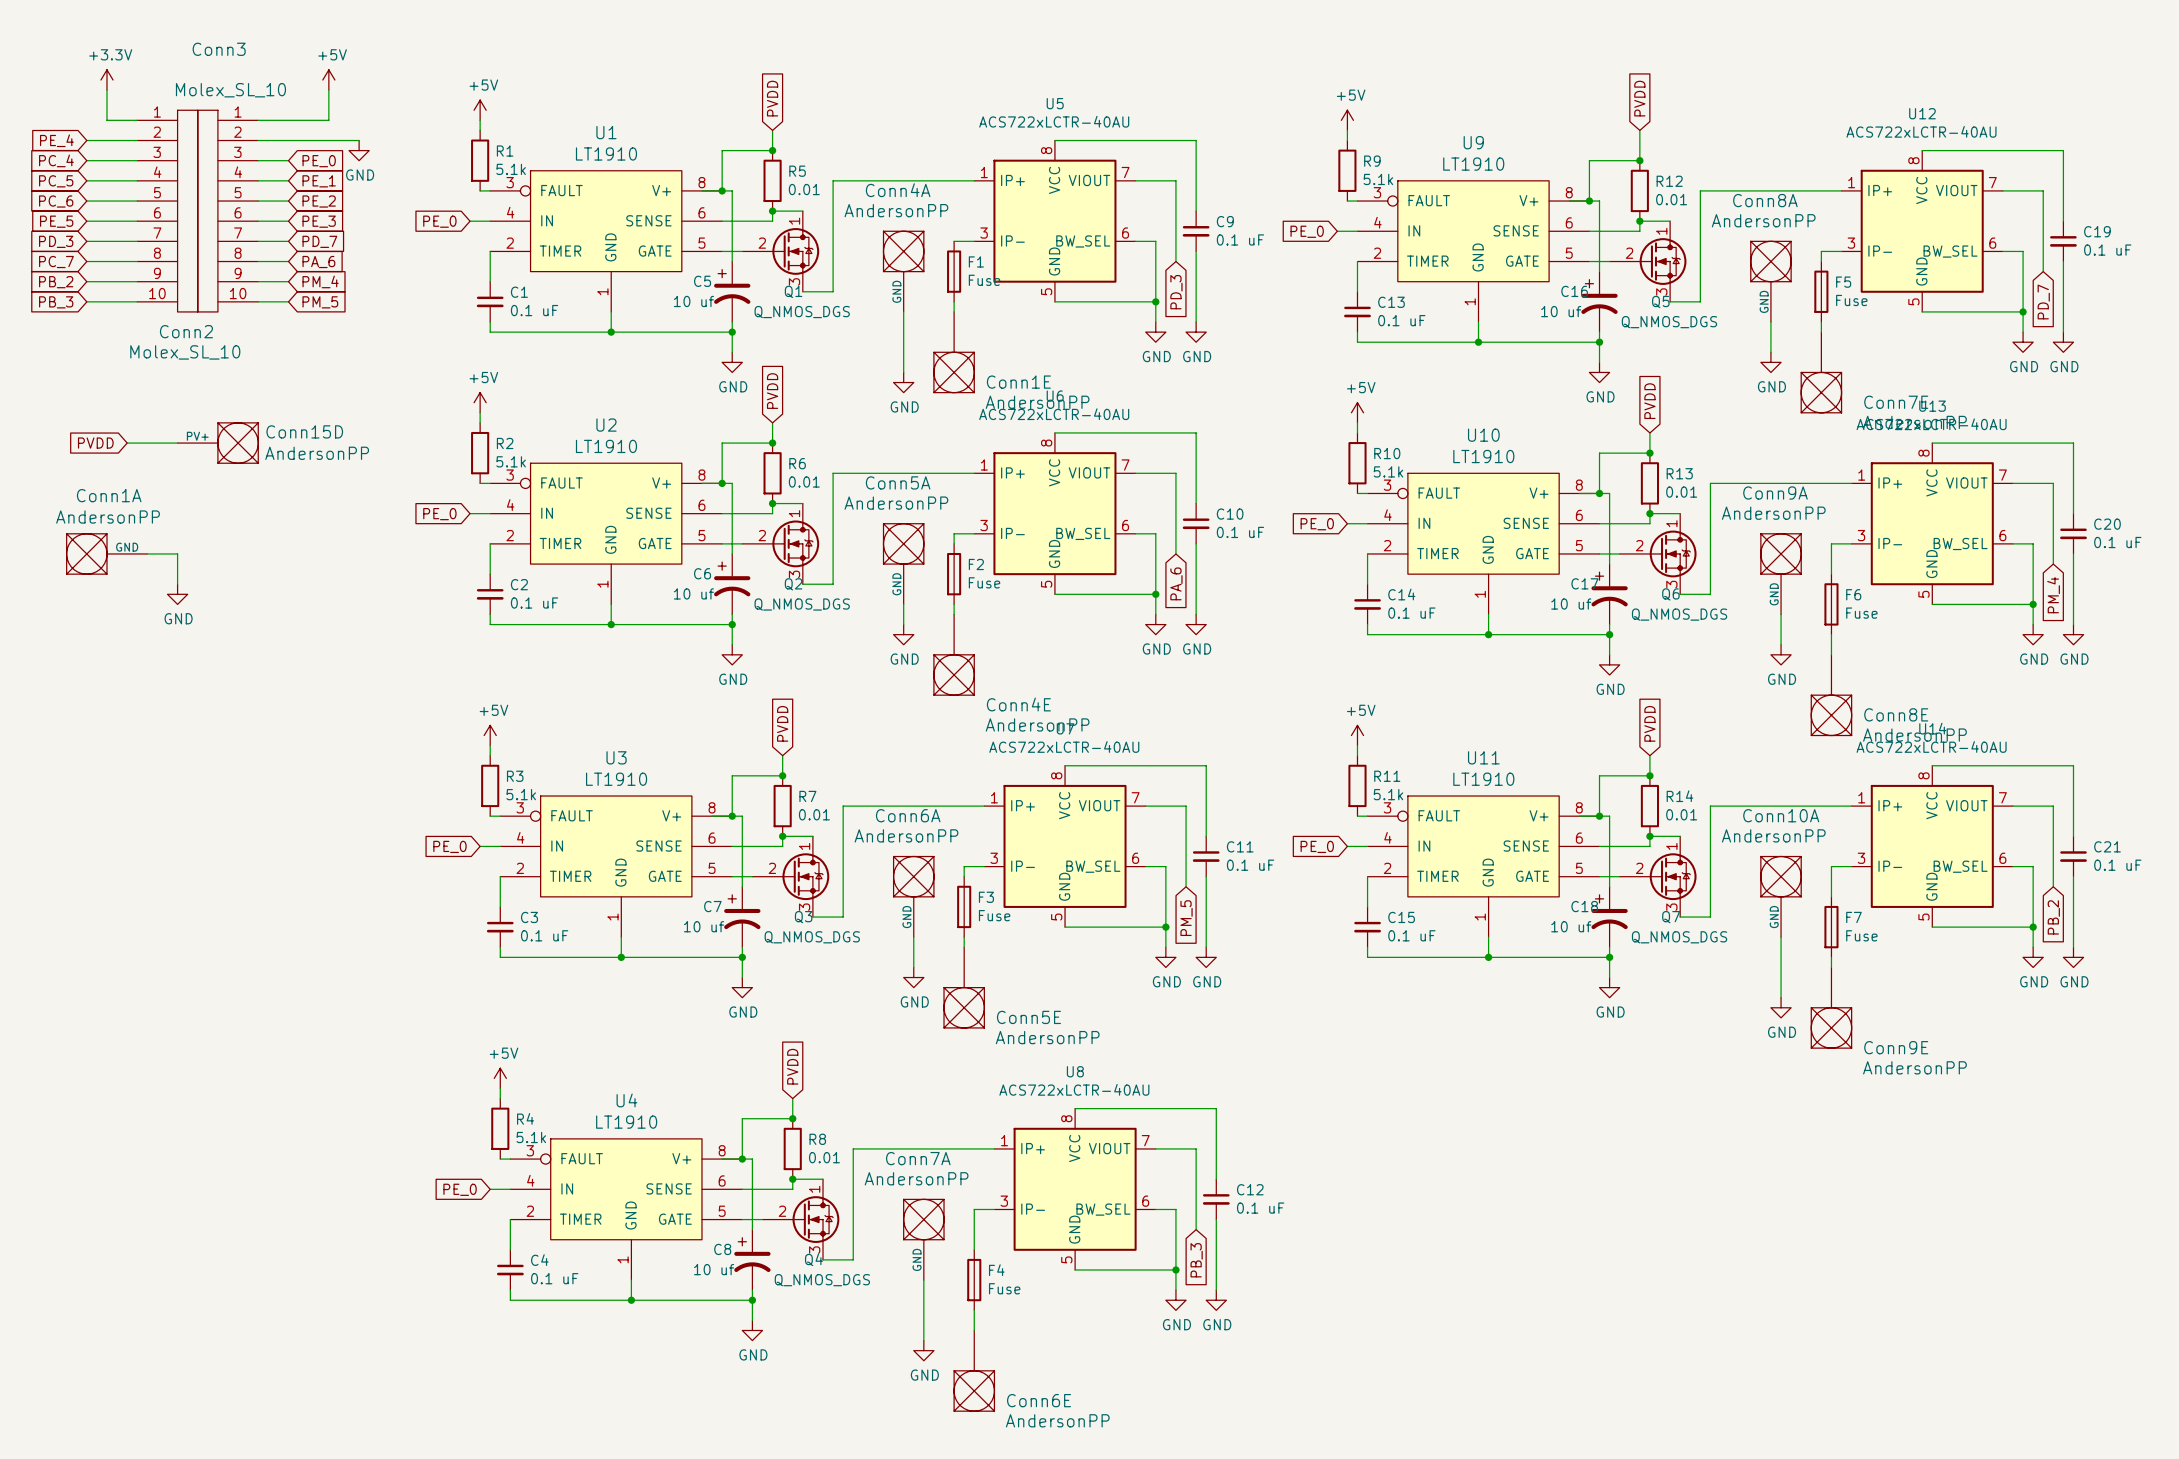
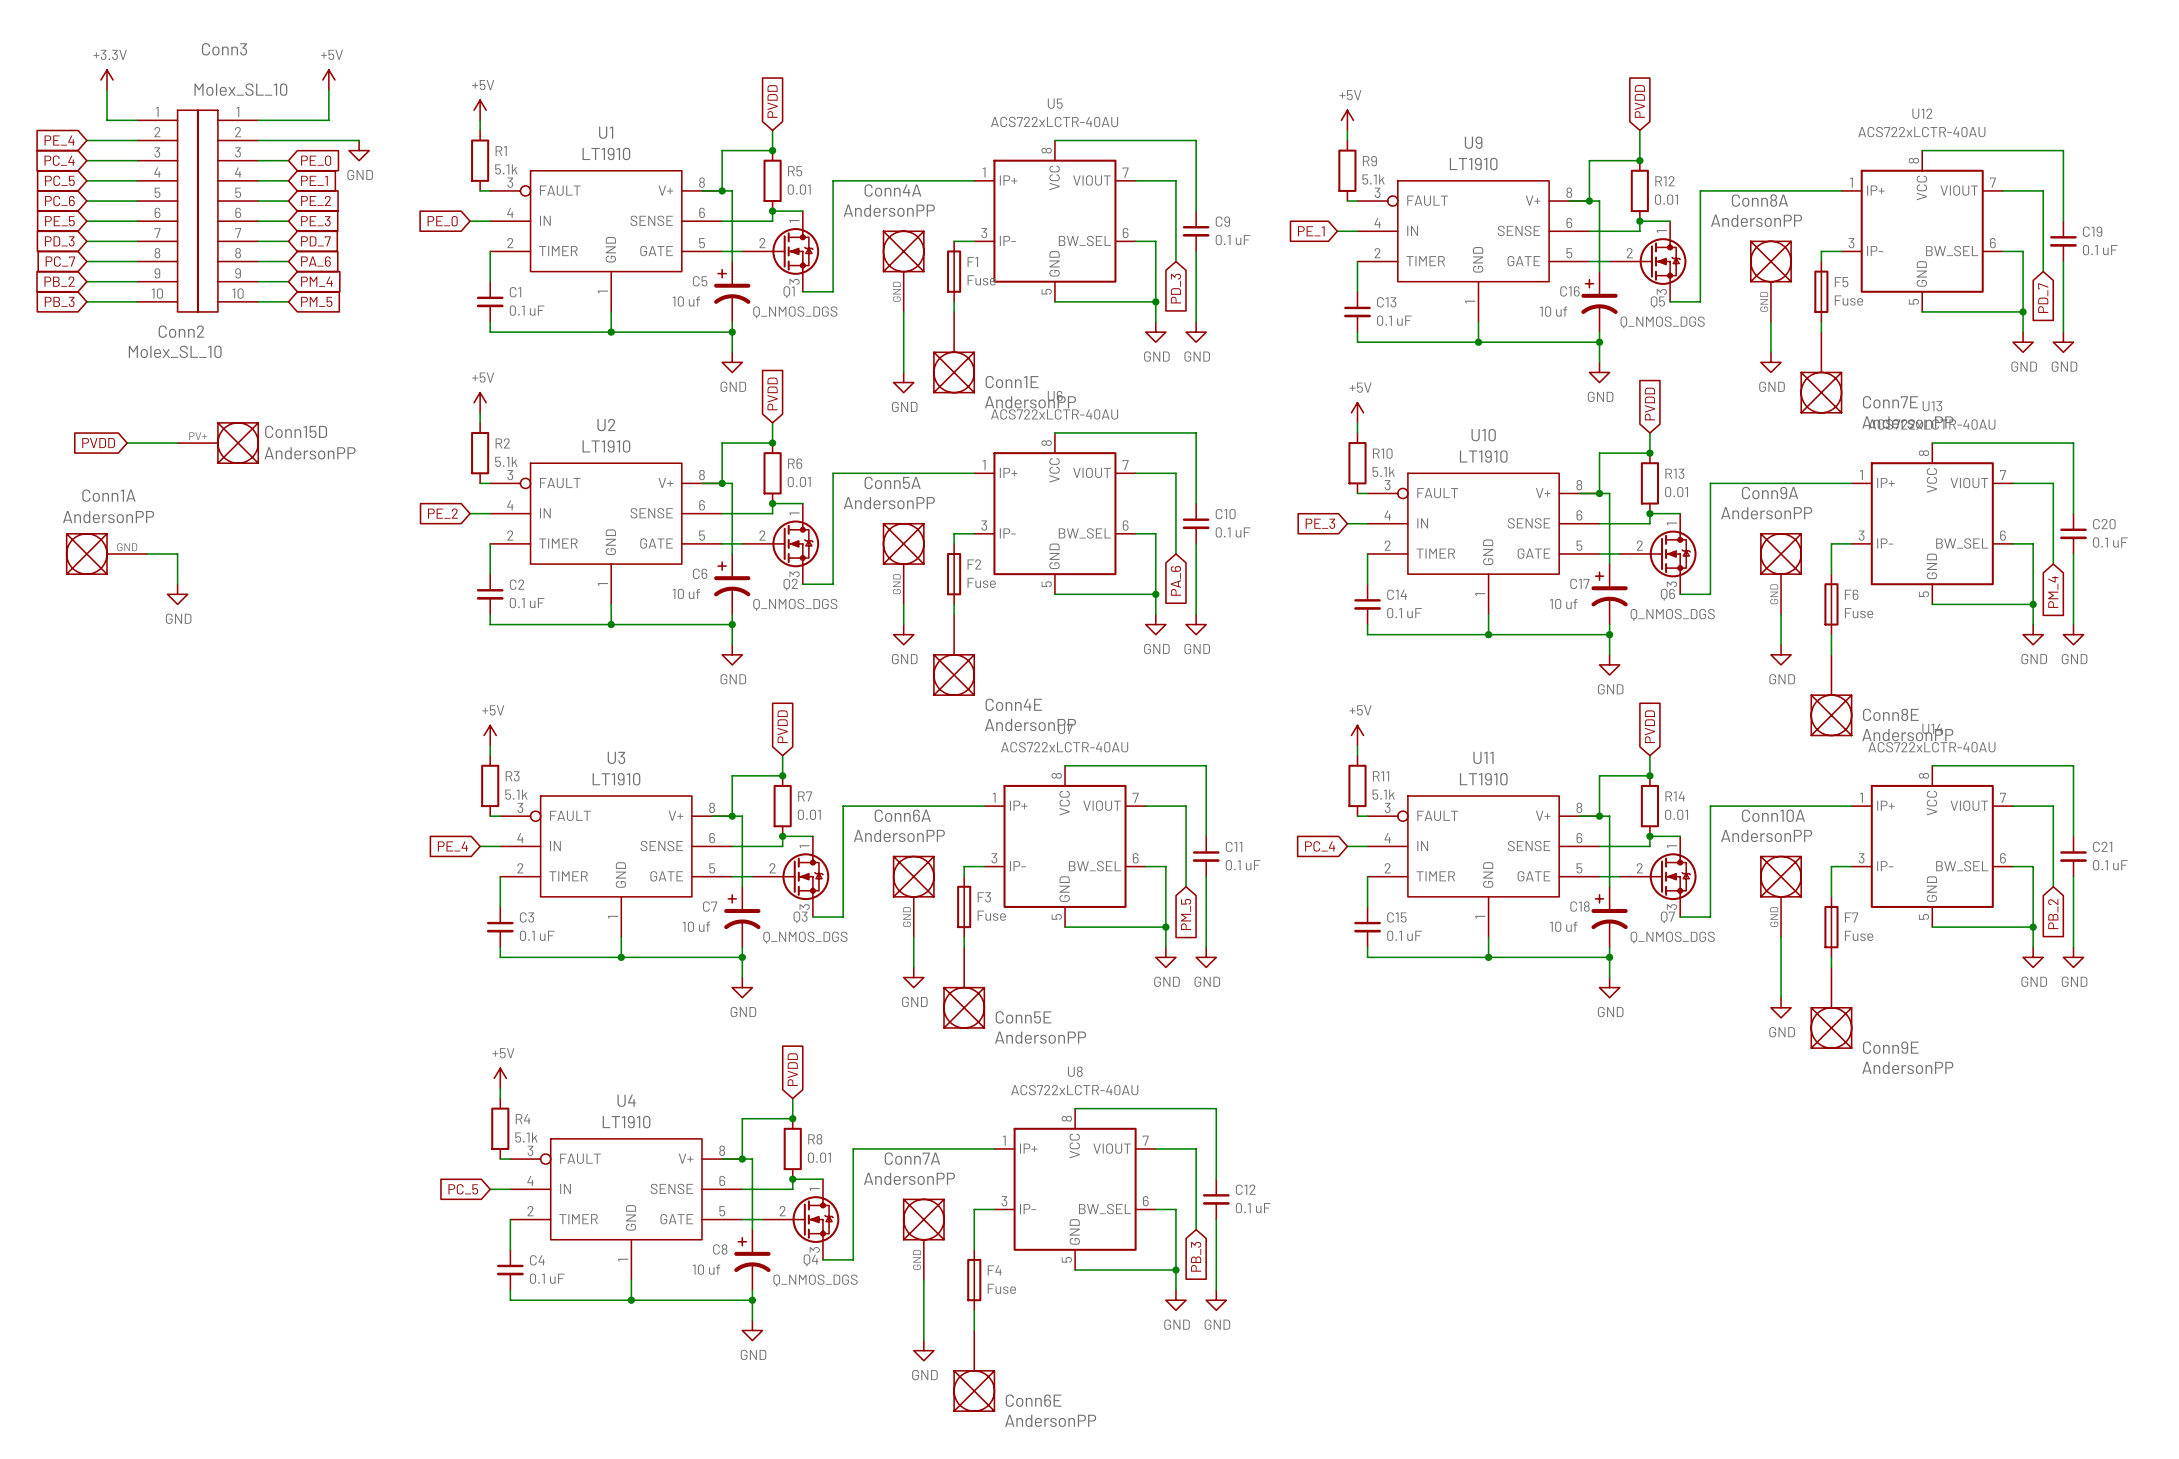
global label: PE_0 (1307, 231) -> PE_1 (1311, 231)
global label: PE_0 (439, 514) -> PE_2 (442, 513)
global label: PE_0 (1317, 524) -> PE_3 (1320, 523)
global label: PE_0 (449, 846) -> PE_4 (452, 846)
global label: PE_0 (1317, 846) -> PC_4 (1320, 846)
global label: PE_0 (460, 1189) -> PC_5 (463, 1189)

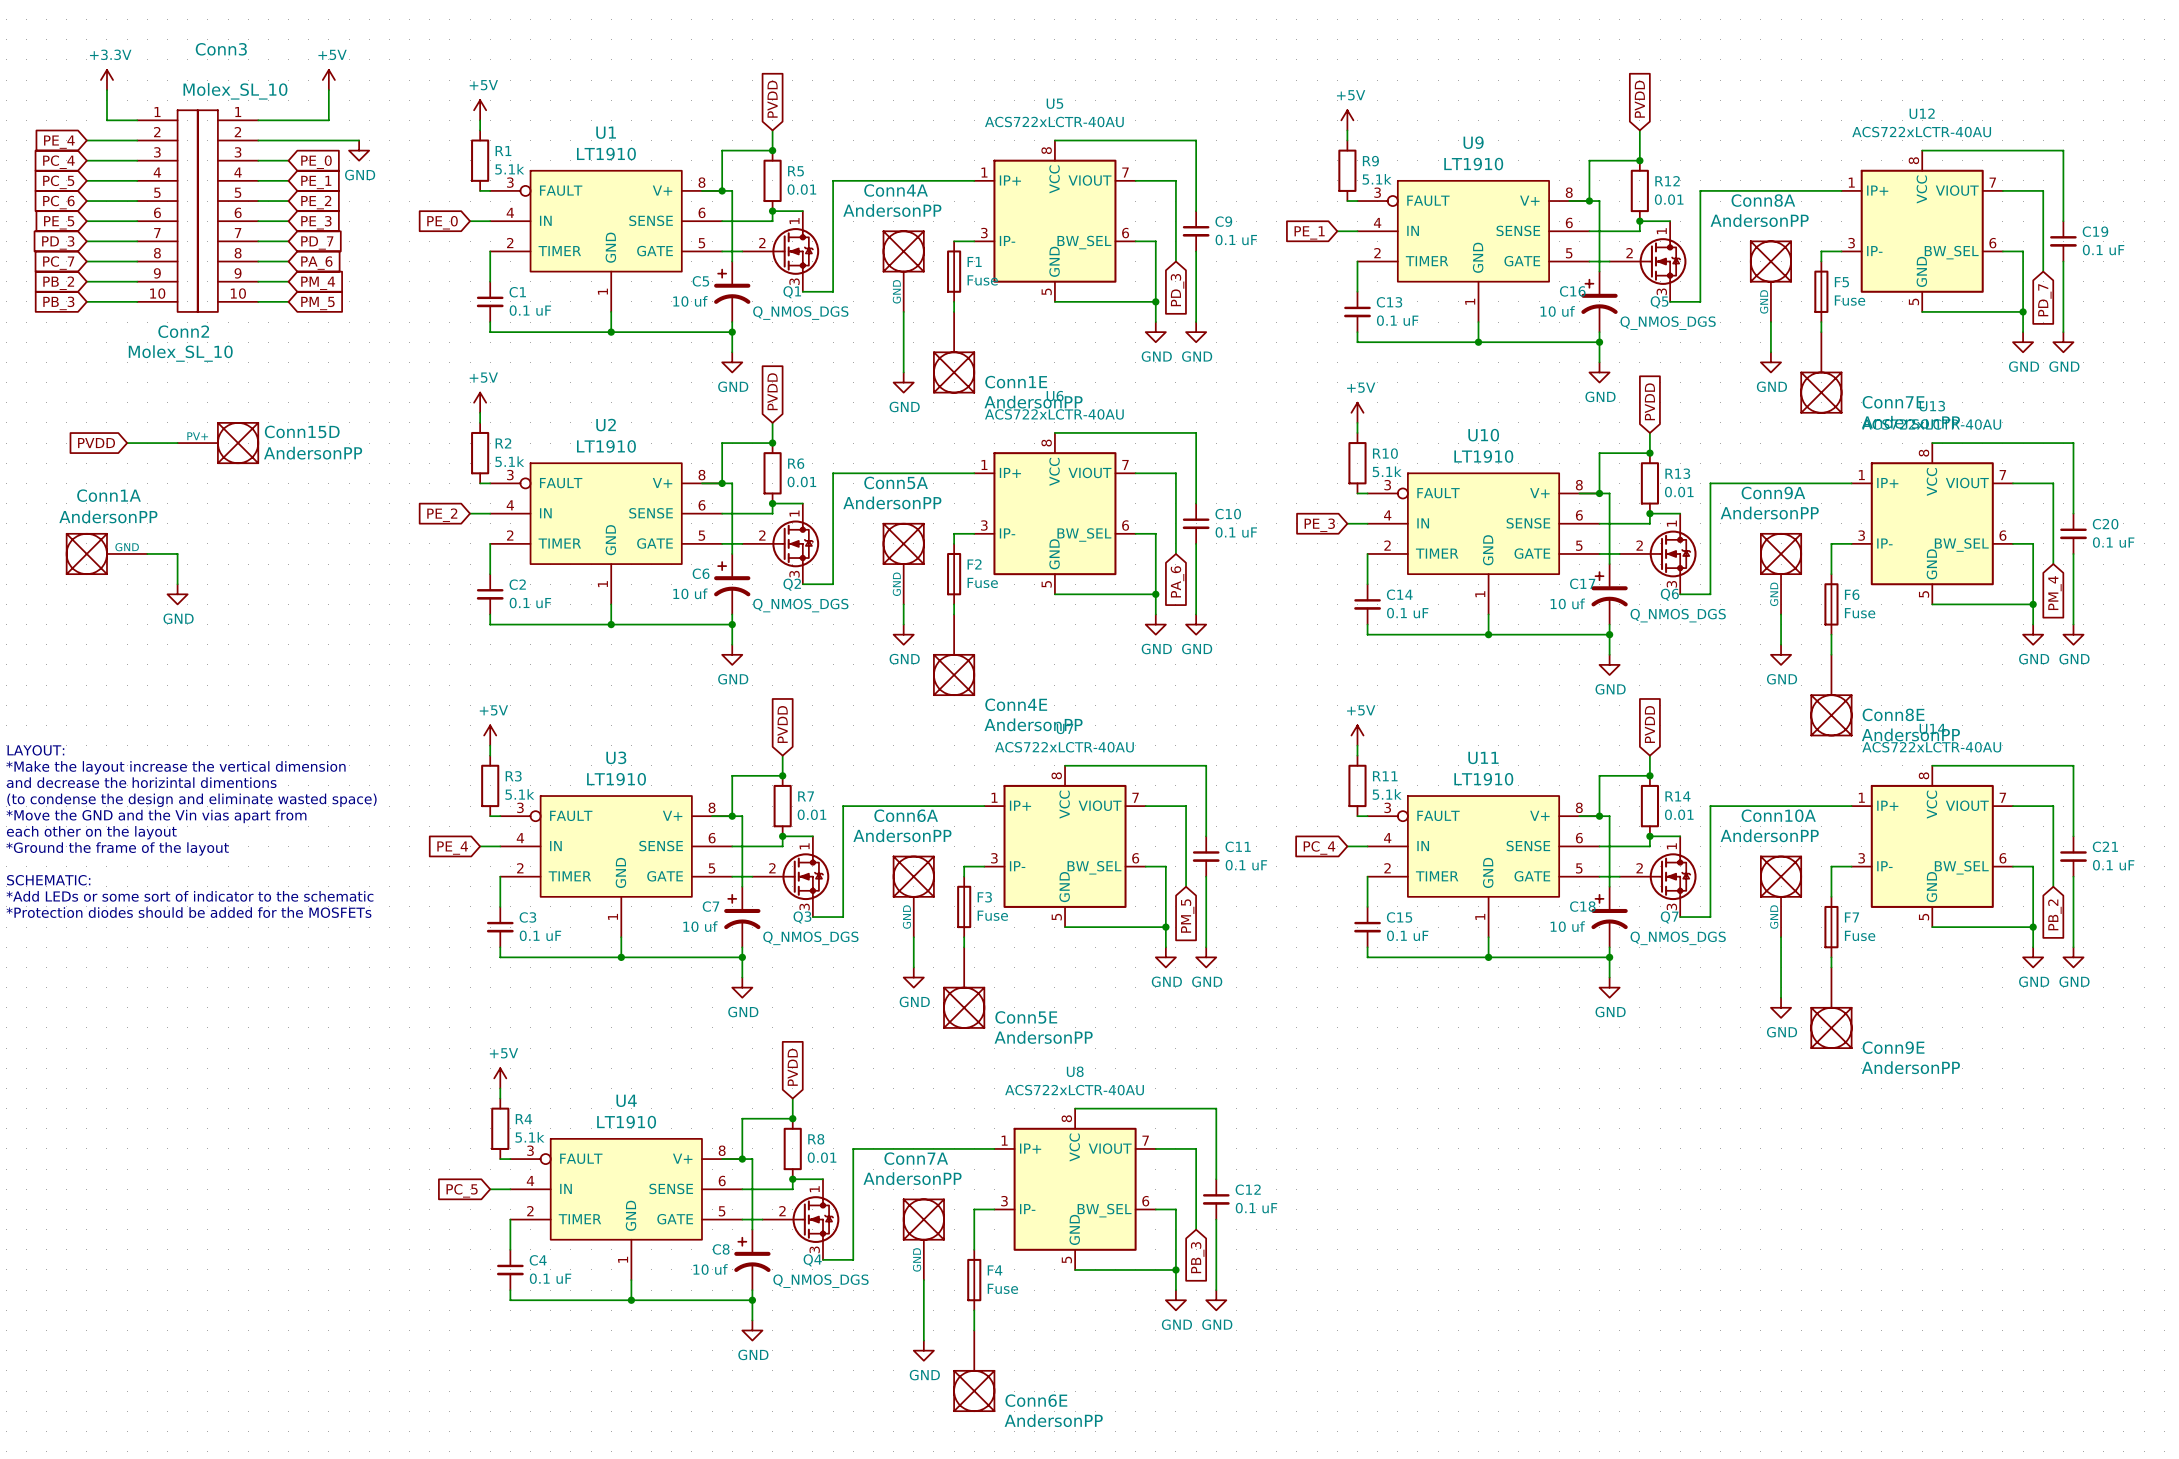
text: none -> LAYOUT: (35, 750)
text: none -> *Make the layout increase the vertical dimension (176, 767)
text: none -> and decrease the horizintal dimentions (141, 782)
text: none -> (to condense the design and eliminate wasted space) (191, 800)
text: none -> *Move the GND and the Vin vias apart from (156, 816)
text: none -> each other on the layout (91, 832)
text: none -> *Ground the frame of the layout (117, 848)
text: none -> SCHEMATIC: (48, 880)
text: none -> *Add LEDs or some sort of indicator to the schematic (189, 896)
text: none -> *Protection diodes should be added for the MOSFETs (188, 912)

